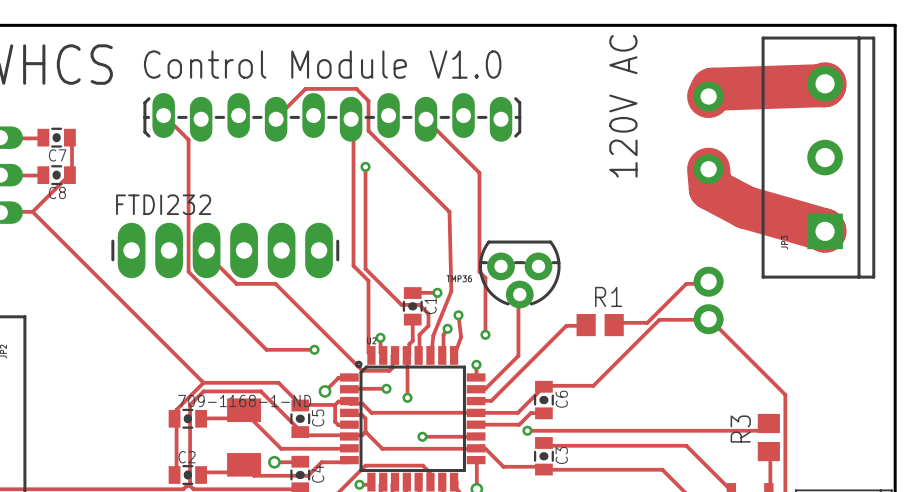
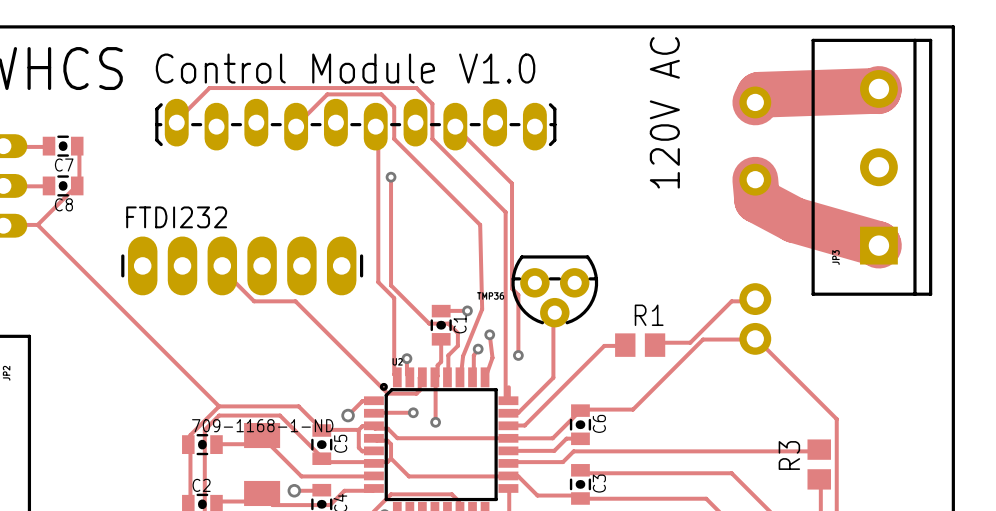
track: (163, 115) (188, 139) (188, 271) (266, 349) (314, 349) -> (176, 122) (209, 88) (416, 88) (432, 103) (432, 138) (505, 212) (505, 400) (508, 400)
via: (314, 349) -> none
via: (476, 364) -> none
track: (768, 423) (761, 430) (527, 430) -> (819, 449) (817, 451) (573, 451) (562, 462) (508, 463)
via: (527, 430) -> none
via: (422, 436) -> none
track: (476, 436) (422, 436) -> none

